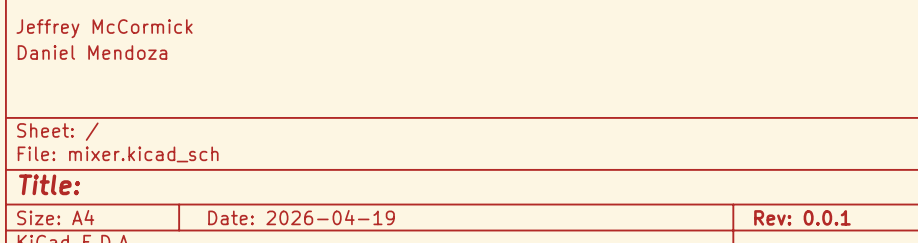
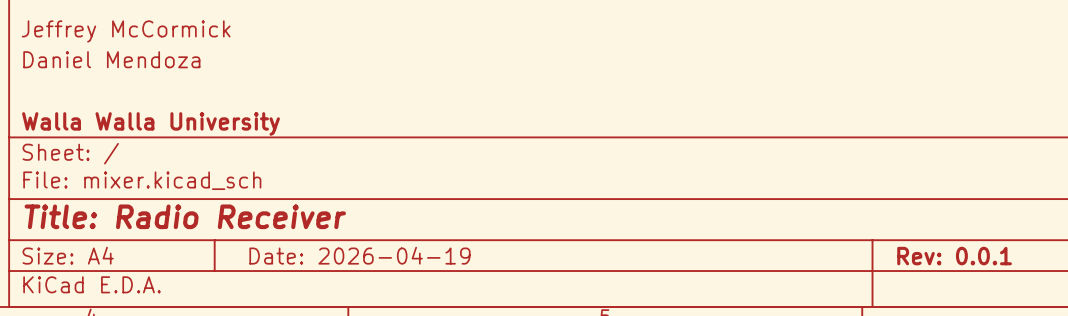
title block: none -> Walla Walla University (151, 123)
title block: Title: (49, 184) -> Title: Radio Receiver (185, 216)

